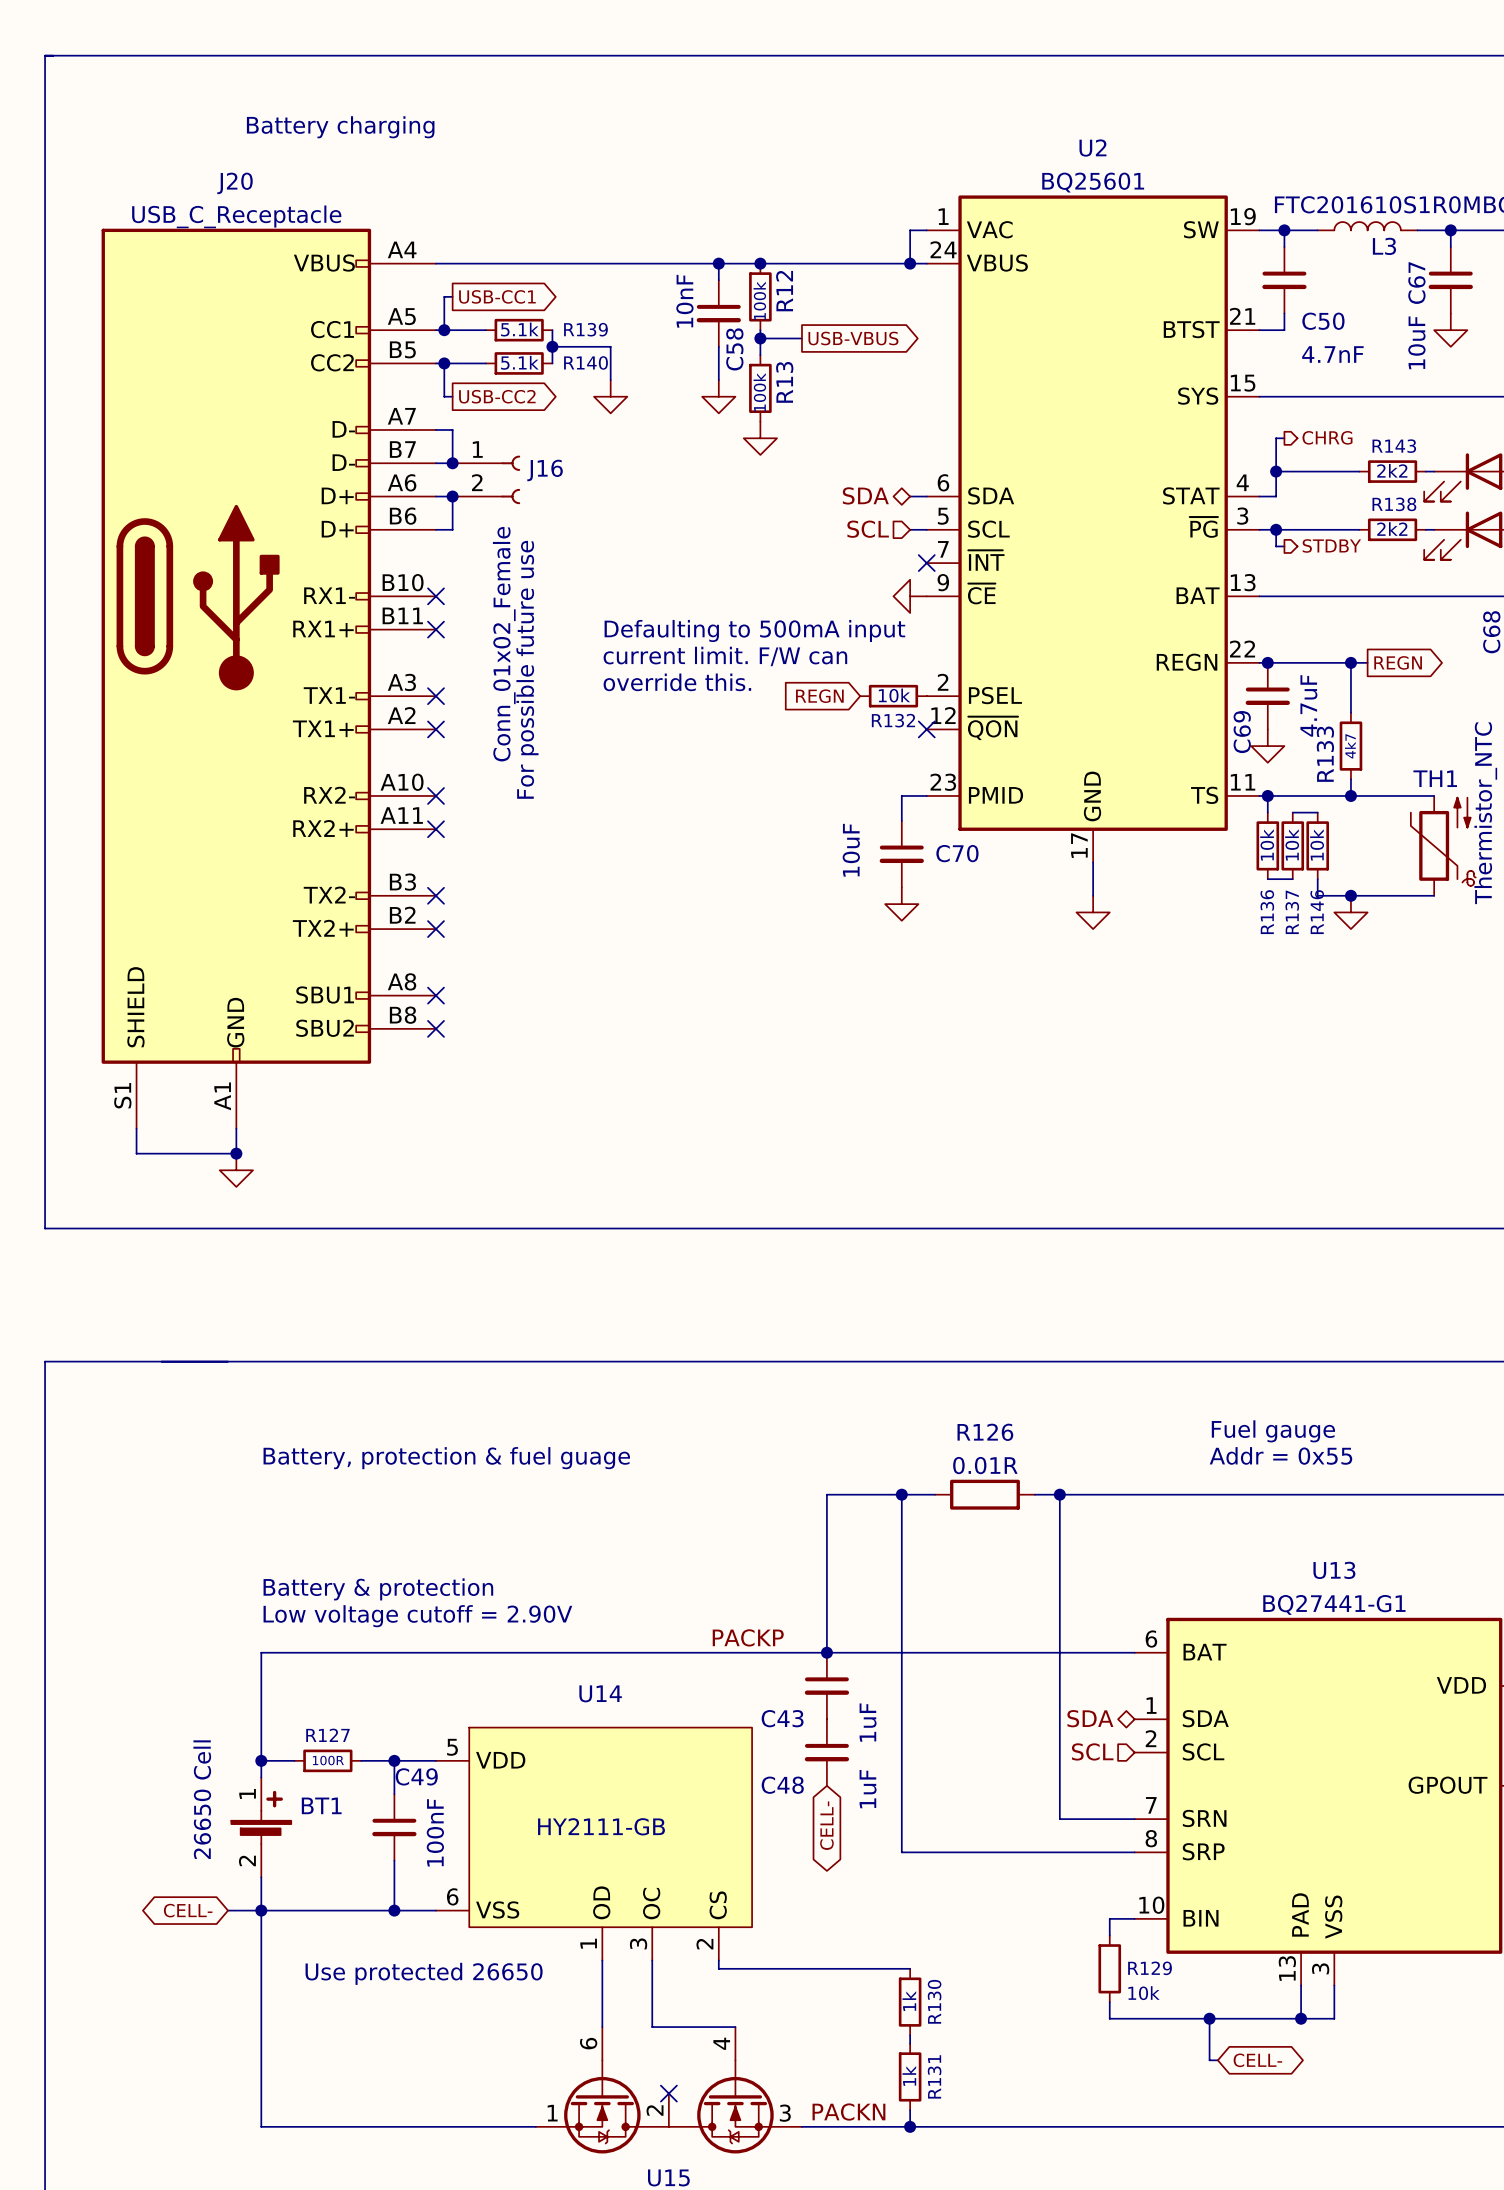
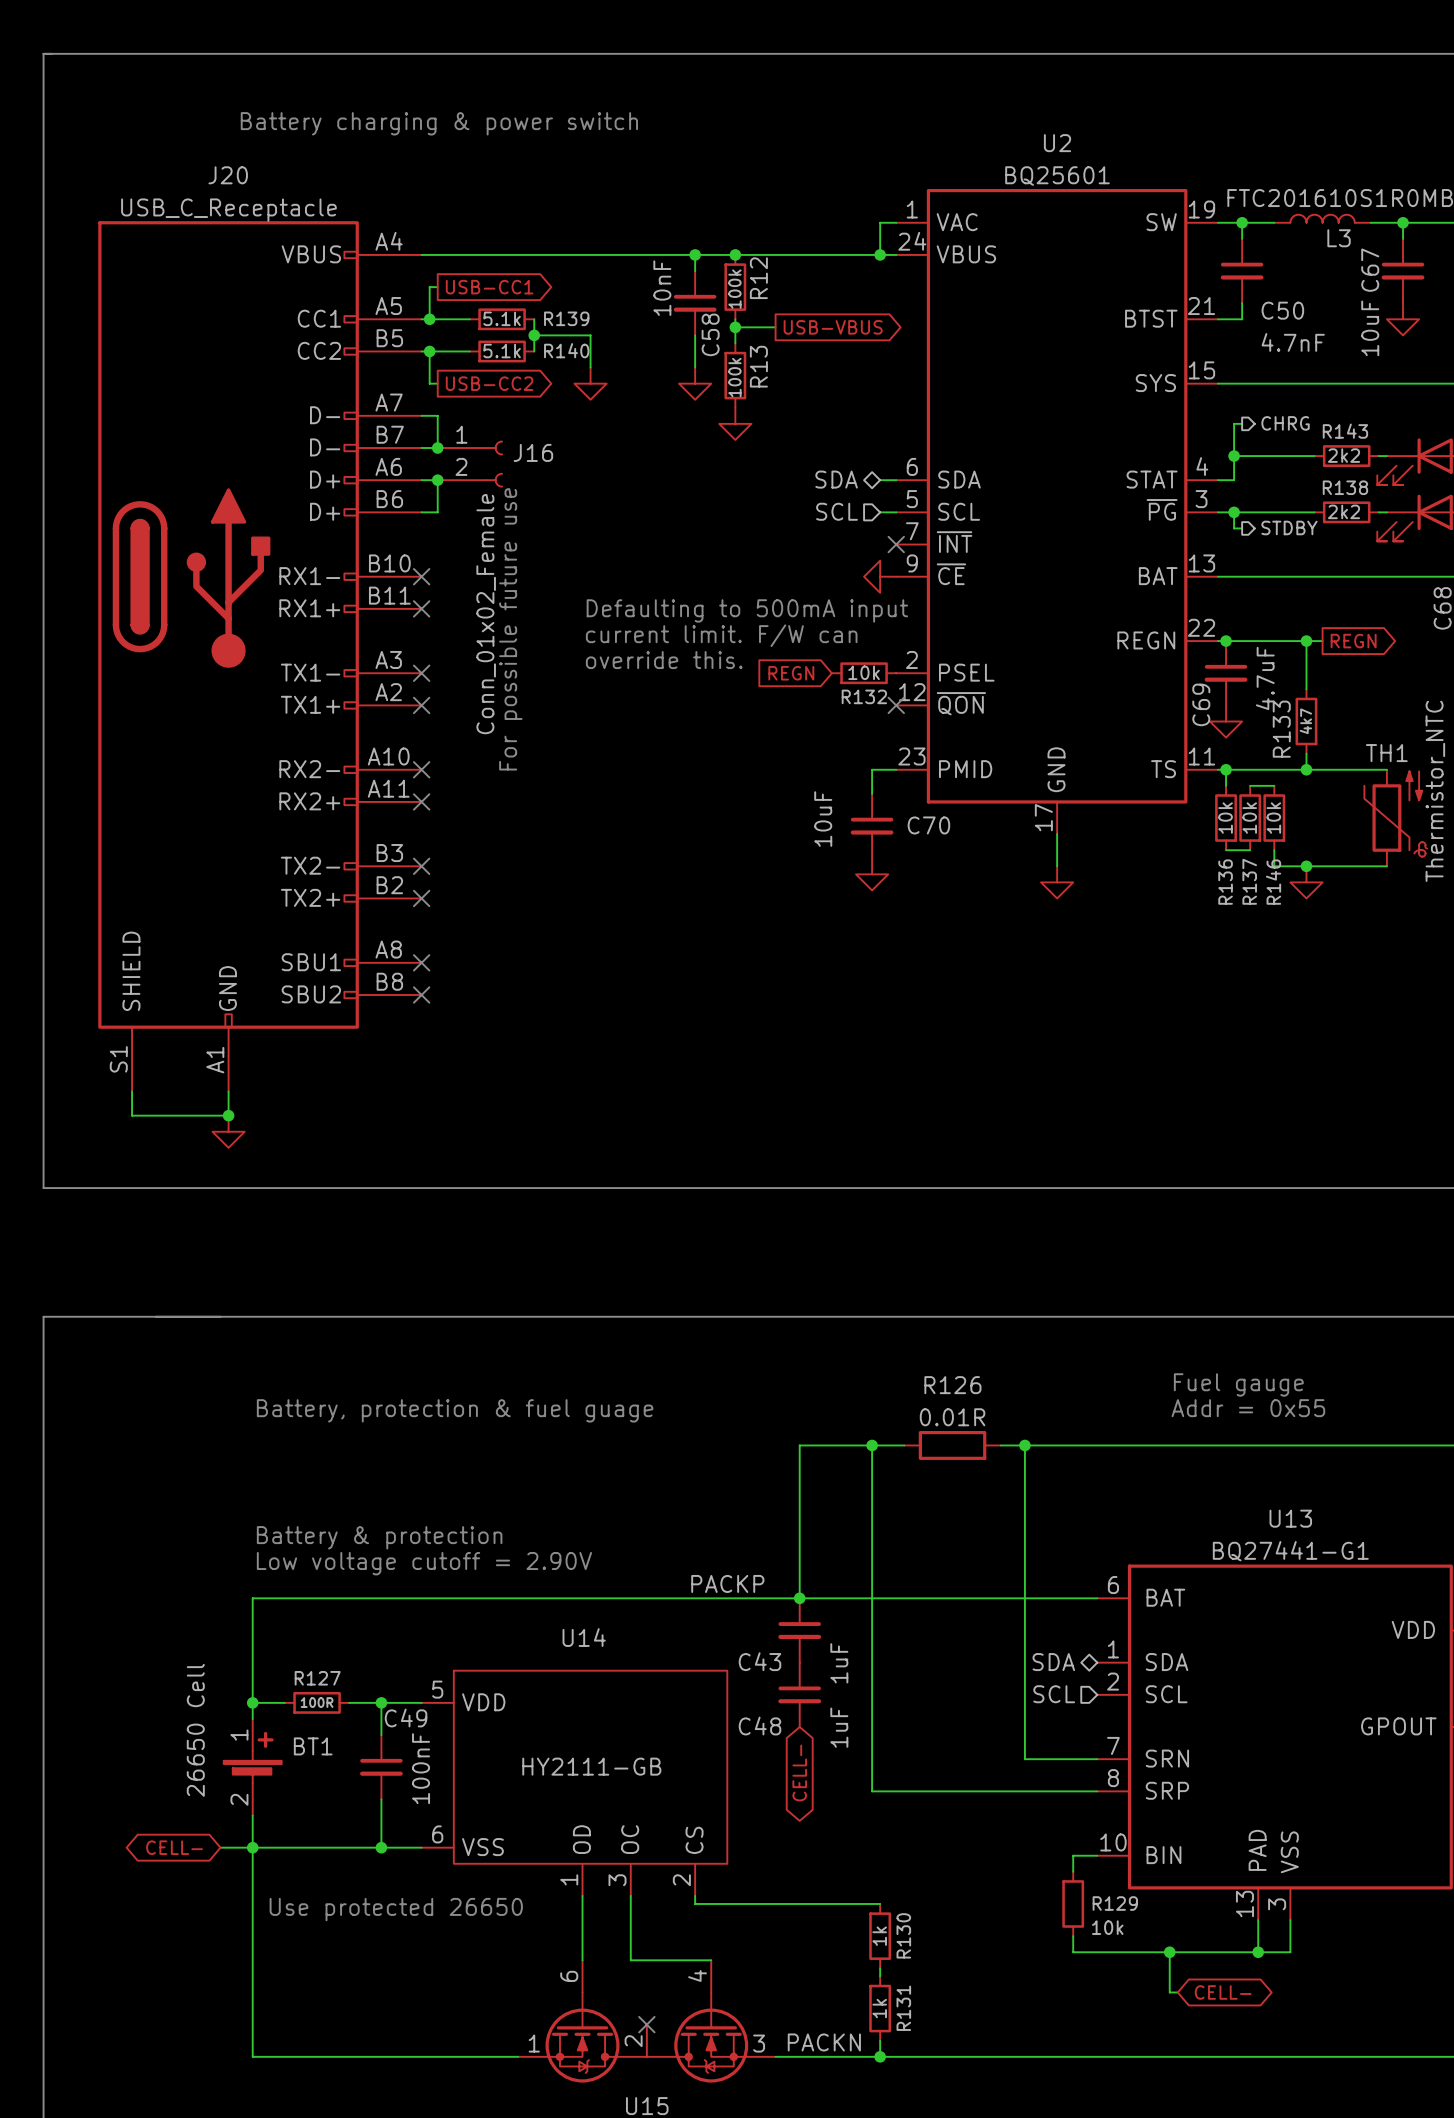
text: Battery charging (340, 127) -> Battery charging & power switch (439, 123)

